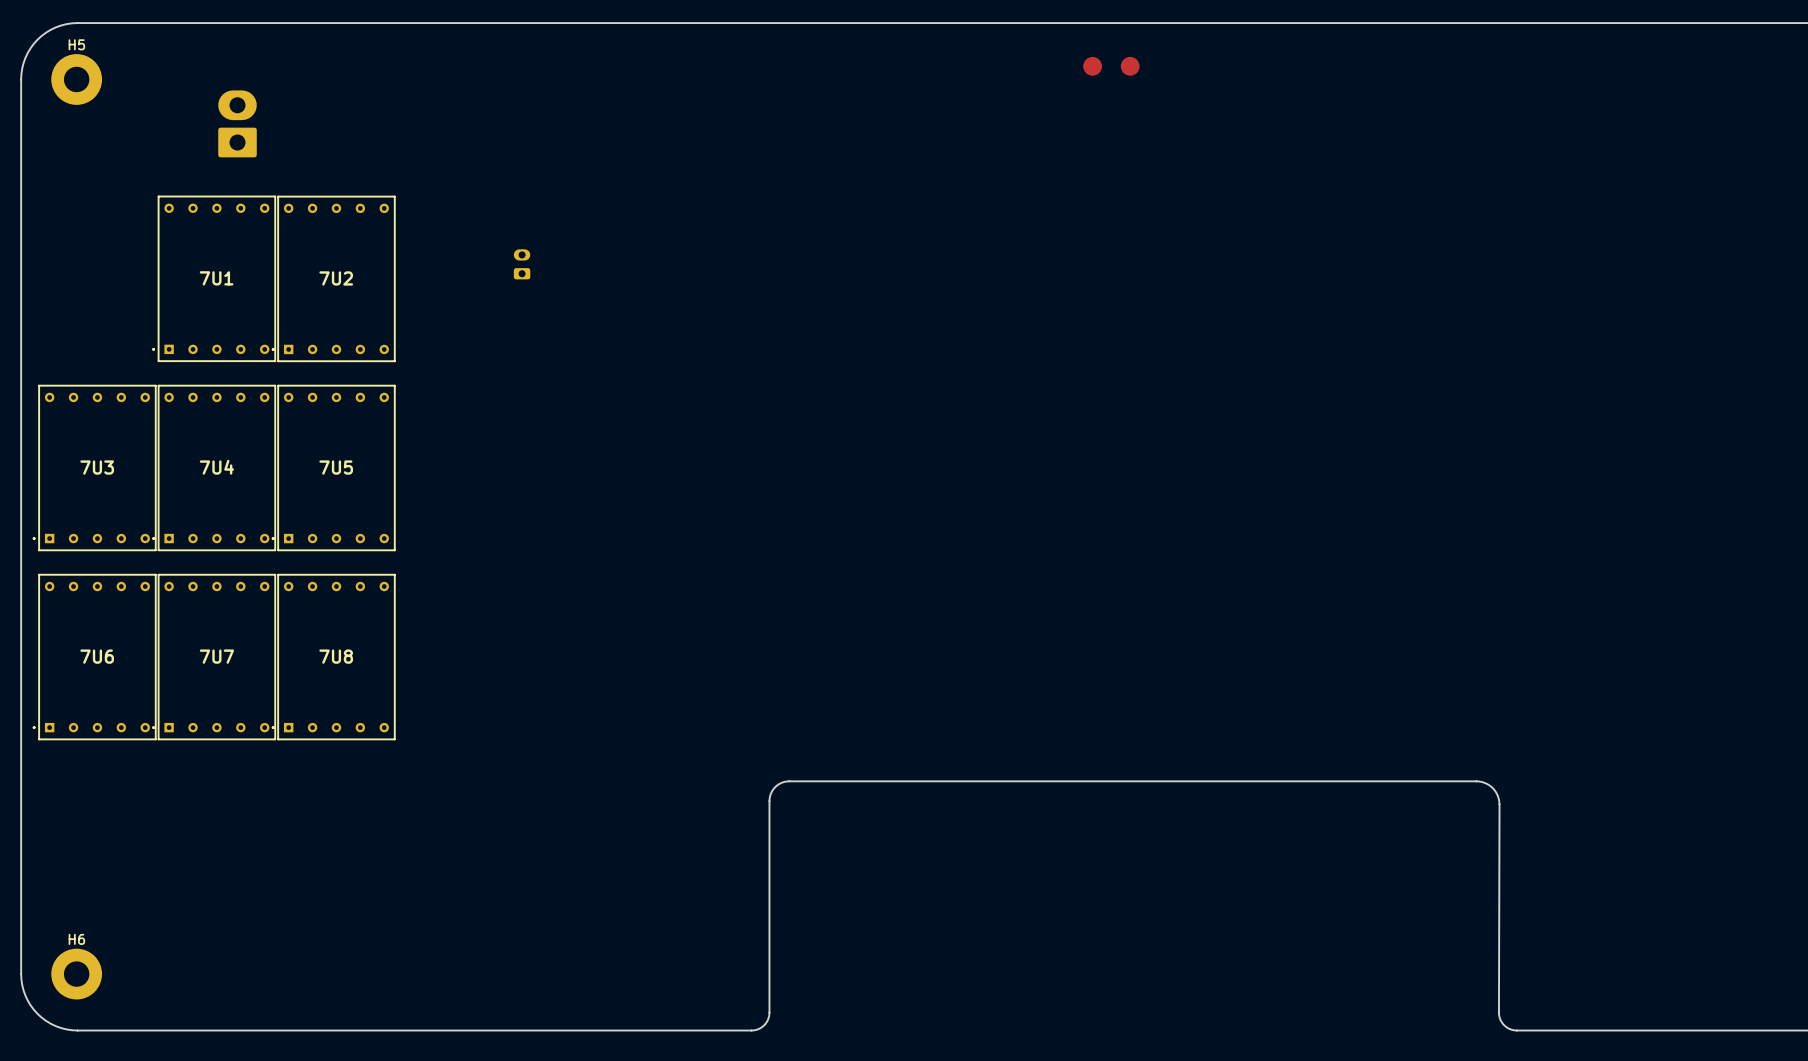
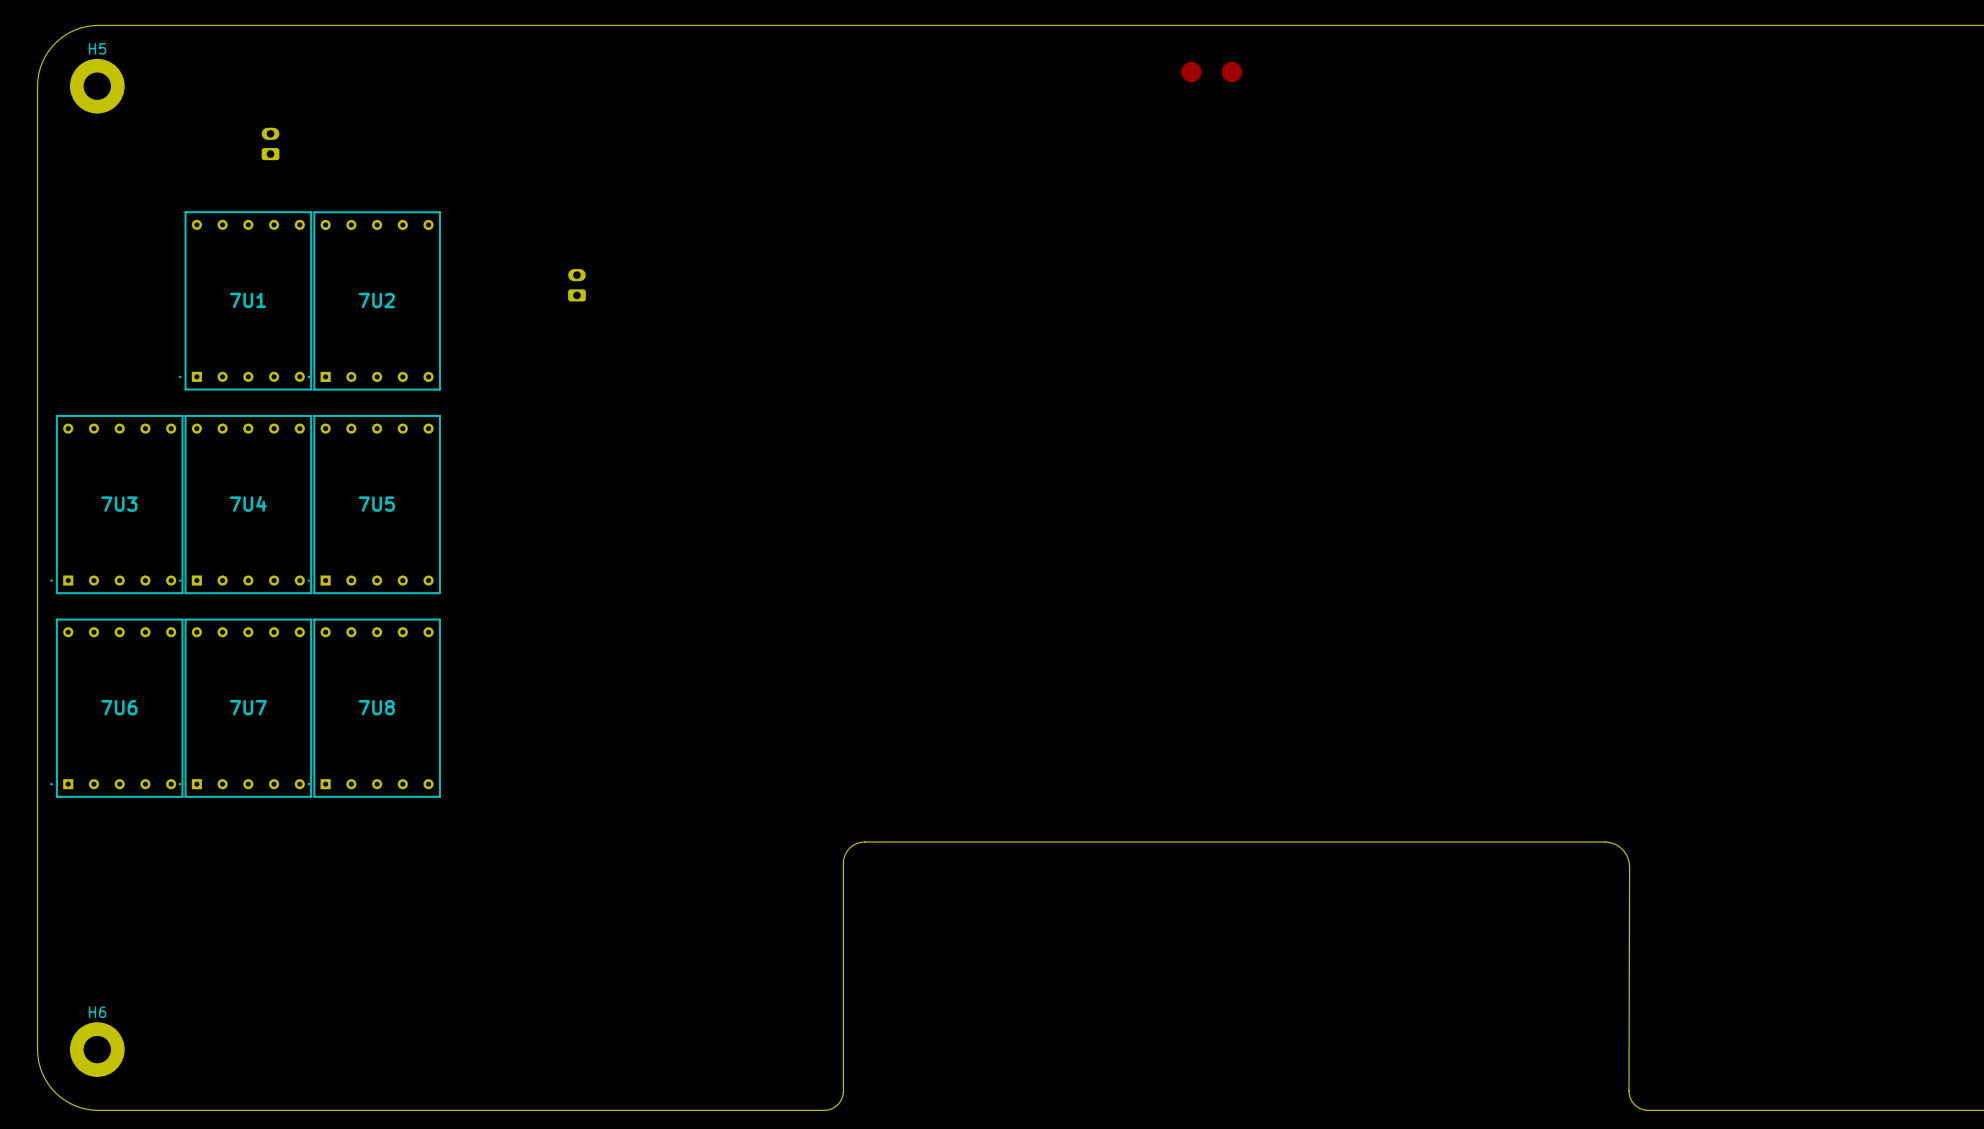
part footprint: [218, 90, 257, 158] -> [261, 127, 280, 161]

